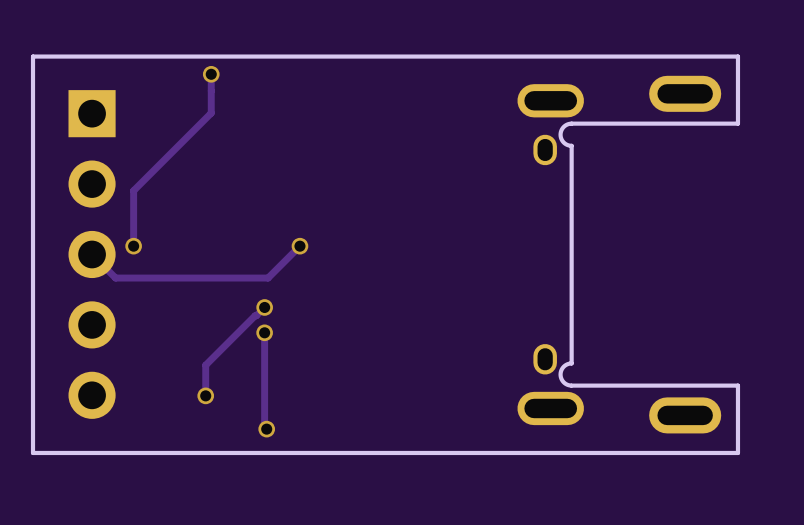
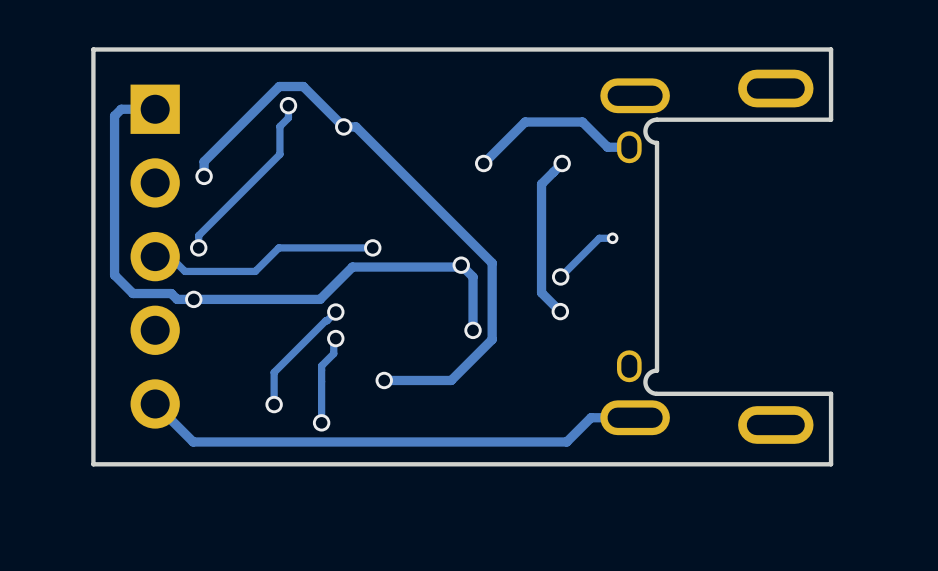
track: (211, 74) (211, 113) (133, 190) (133, 234) -> (288, 105) (288, 117) (279, 126) (279, 154) (198, 235)
via position: (211, 74) -> (288, 105)
track: none -> (155, 109) (121, 109) (114, 115) (114, 275) (132, 293) (171, 293) (177, 299) (320, 299) (352, 267) (459, 267) (461, 265) (473, 276) (473, 330)
via: none -> (343, 126)
track: none -> (629, 147) (607, 147) (582, 122) (525, 122) (483, 163)
via: none -> (483, 163)
via: none -> (562, 163)
track: none -> (559, 165) (562, 163) (541, 184) (541, 292) (560, 311)
track: none -> (204, 176) (204, 161) (279, 86) (303, 86) (343, 126) (356, 126) (492, 263) (492, 339) (451, 380) (384, 380)
via: none -> (204, 176)
track: none -> (612, 238) (599, 238) (560, 276)
via: none -> (612, 238)
track: (299, 246) (268, 278) (115, 278) (92, 254) -> (372, 247) (278, 247) (255, 271) (184, 271) (170, 256) (155, 256)
via: none -> (461, 265)
via: none -> (560, 276)
via: none -> (193, 299)
via: none -> (560, 311)
via: none -> (473, 330)
track: (264, 332) (264, 427) (266, 429) -> none
track: none -> (333, 341) (333, 353) (321, 365) (321, 422)
via: none -> (384, 380)
track: none -> (155, 403) (193, 441) (566, 441) (591, 417) (635, 417)
via position: (266, 429) -> (321, 422)

